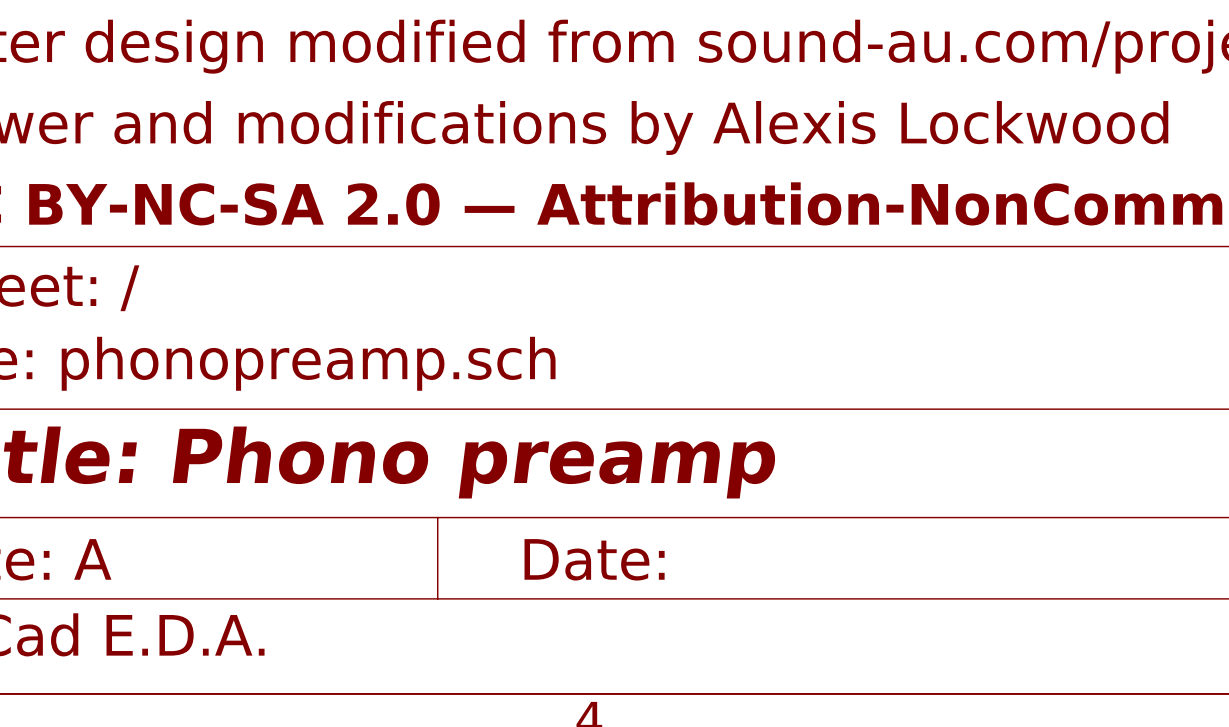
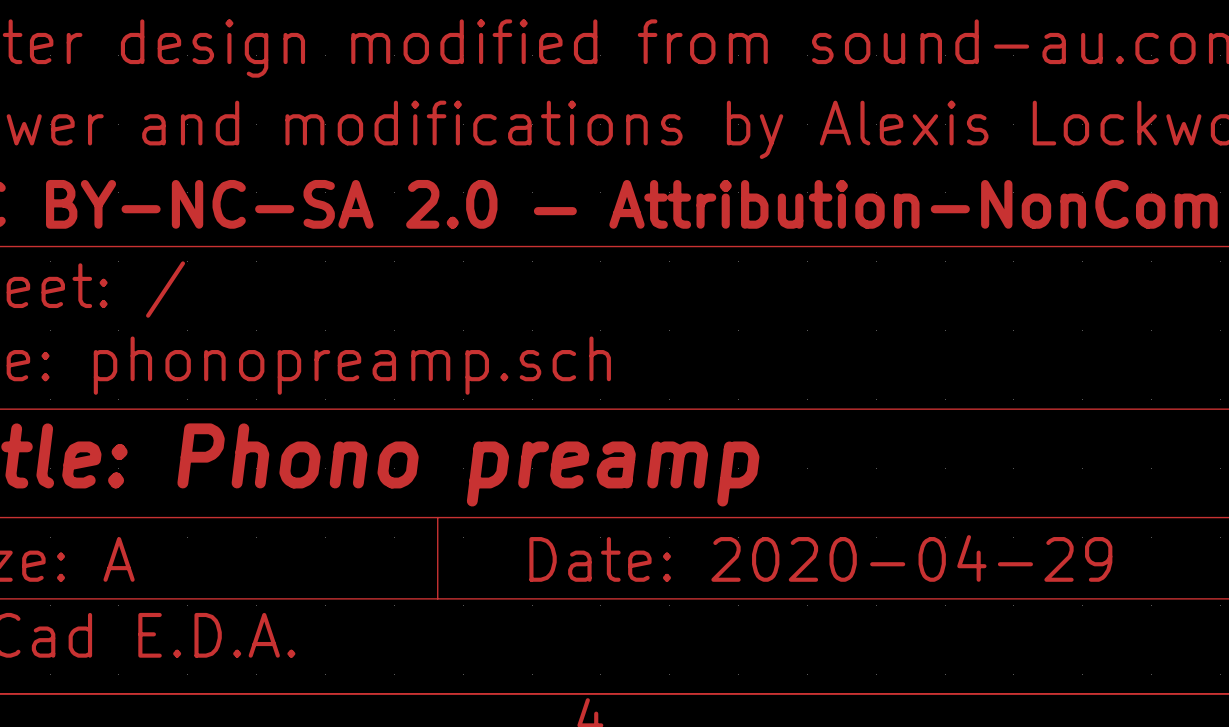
title block: Date: (594, 559) -> Date: 2020-04-29 (820, 558)

